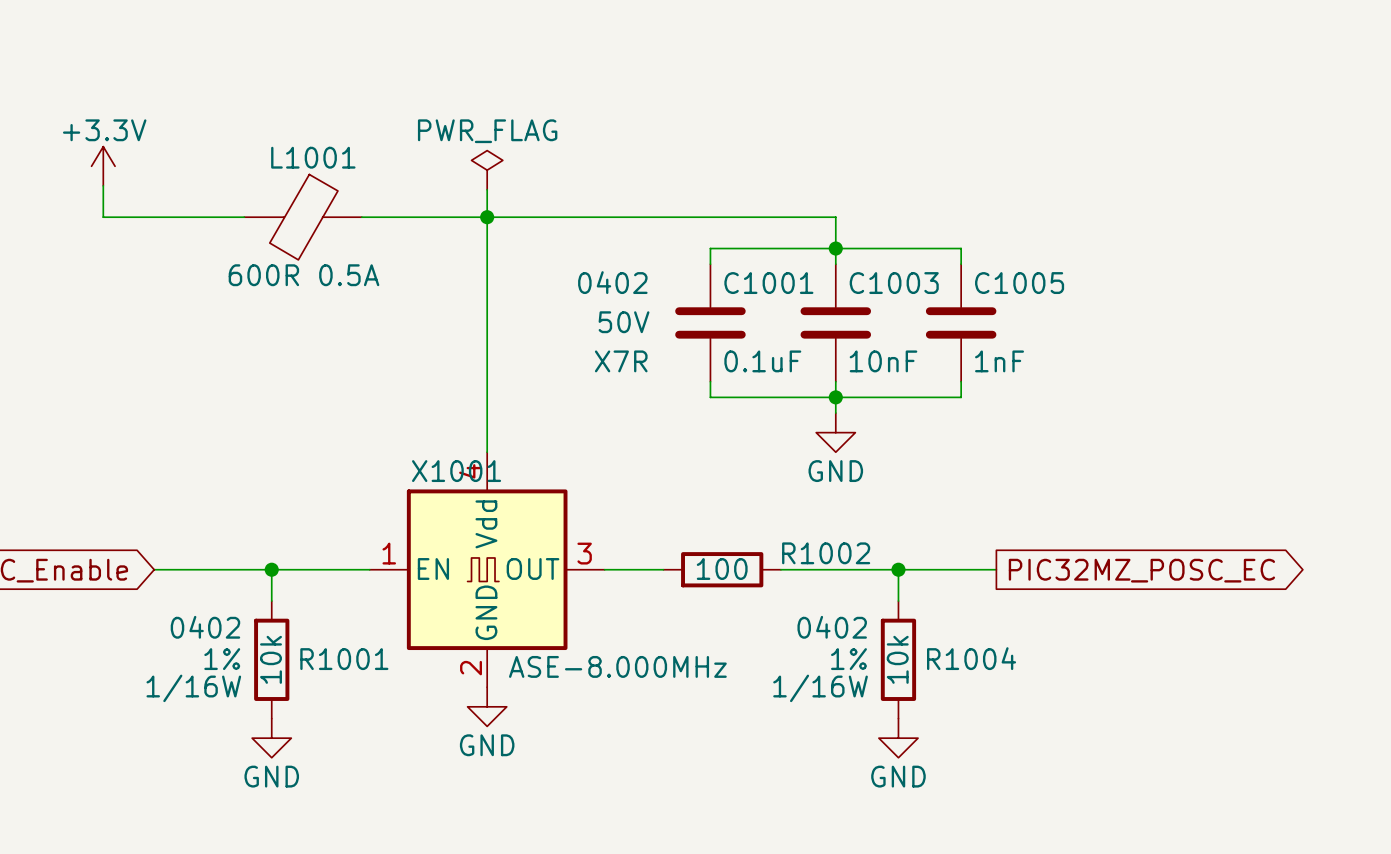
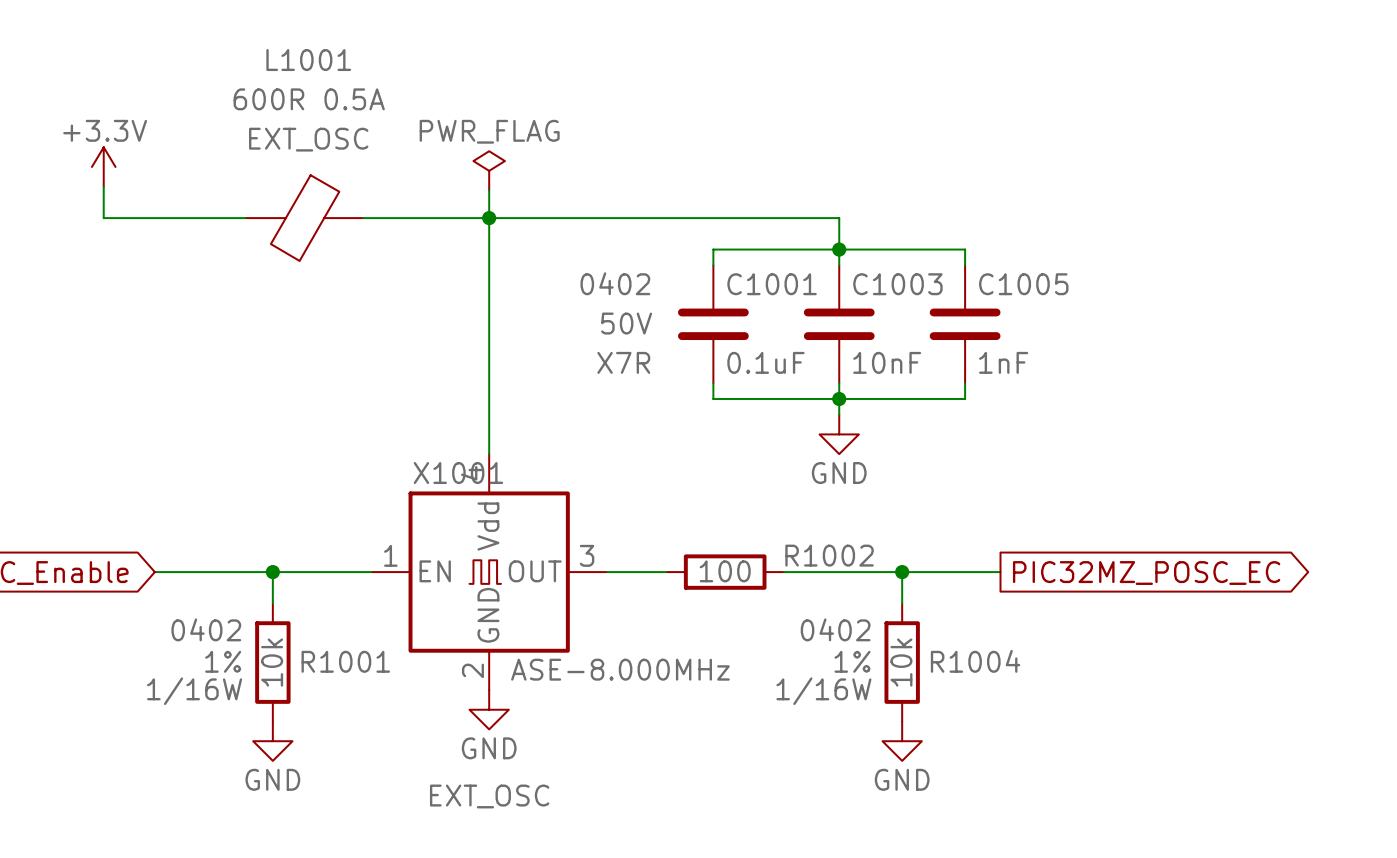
L1001 text: none -> EXT_OSC (308, 139)
L1001 name position: L1001 (313, 157) -> L1001 (308, 60)
L1001 value position: 600R 0.5A (304, 275) -> 600R 0.5A (309, 99)
X1001 text: none -> EXT_OSC (489, 796)

